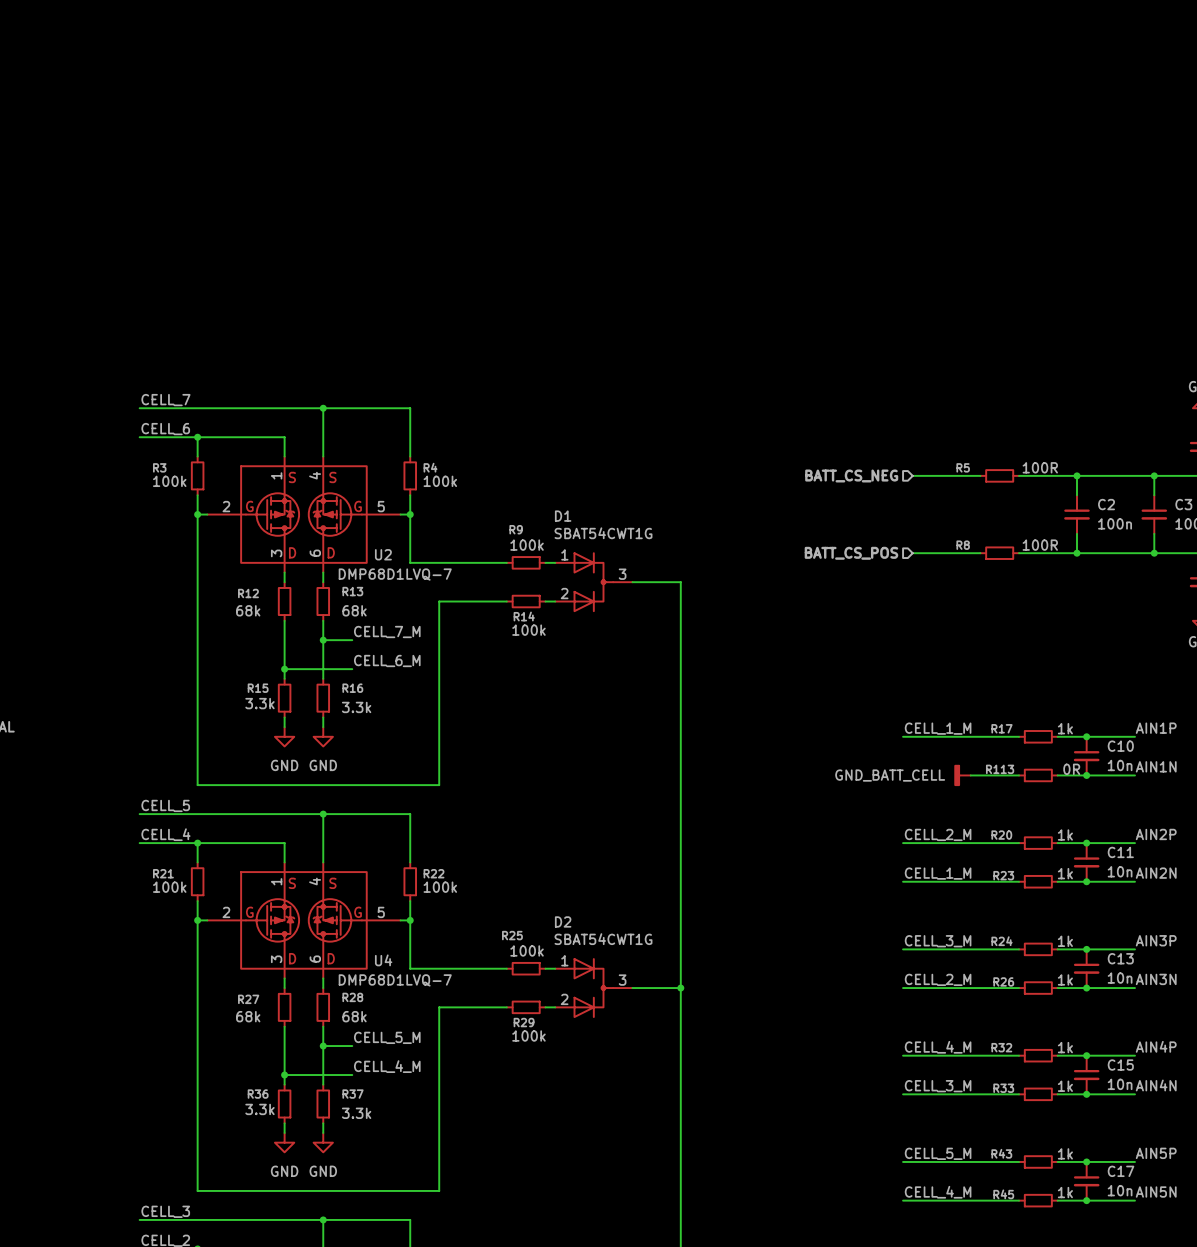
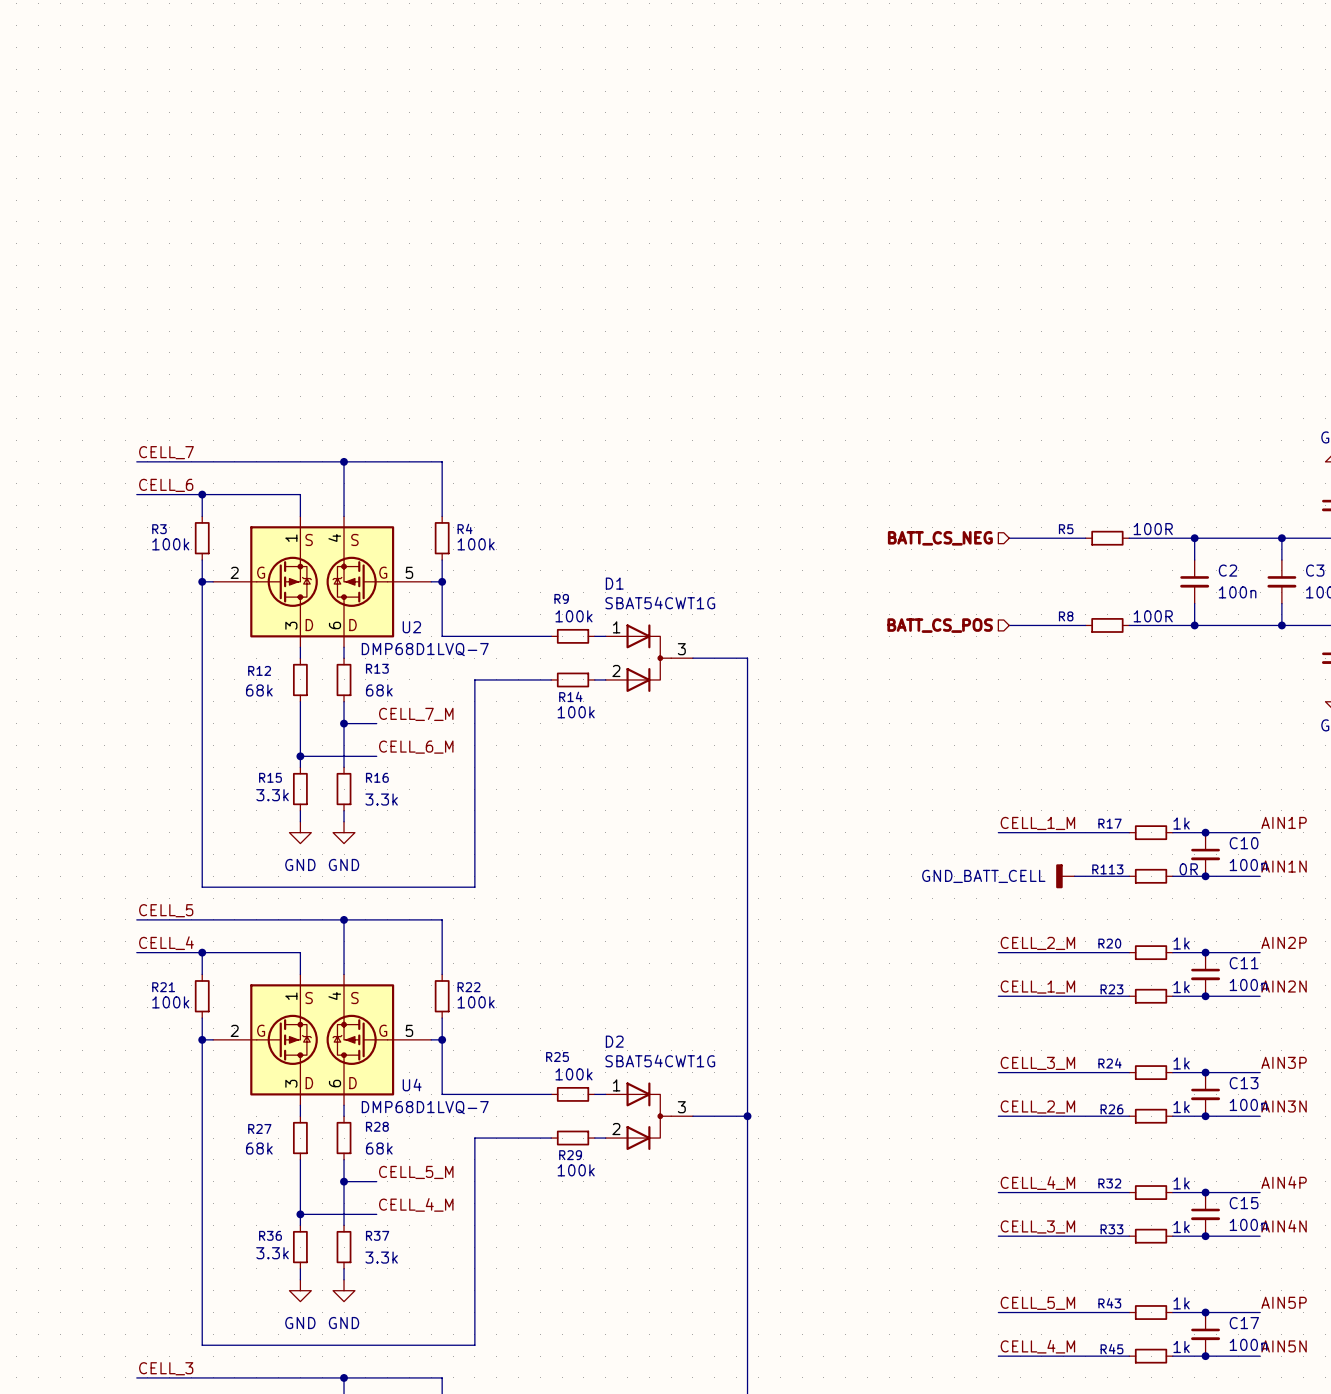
C10 value: 10n (1120, 765) -> 100n (1248, 865)
C11 value: 10n (1120, 871) -> 100n (1248, 984)
C13 value: 10n (1120, 978) -> 100n (1248, 1104)
C15 value: 10n (1120, 1084) -> 100n (1248, 1224)
C17 value: 10n (1120, 1190) -> 100n (1248, 1344)

